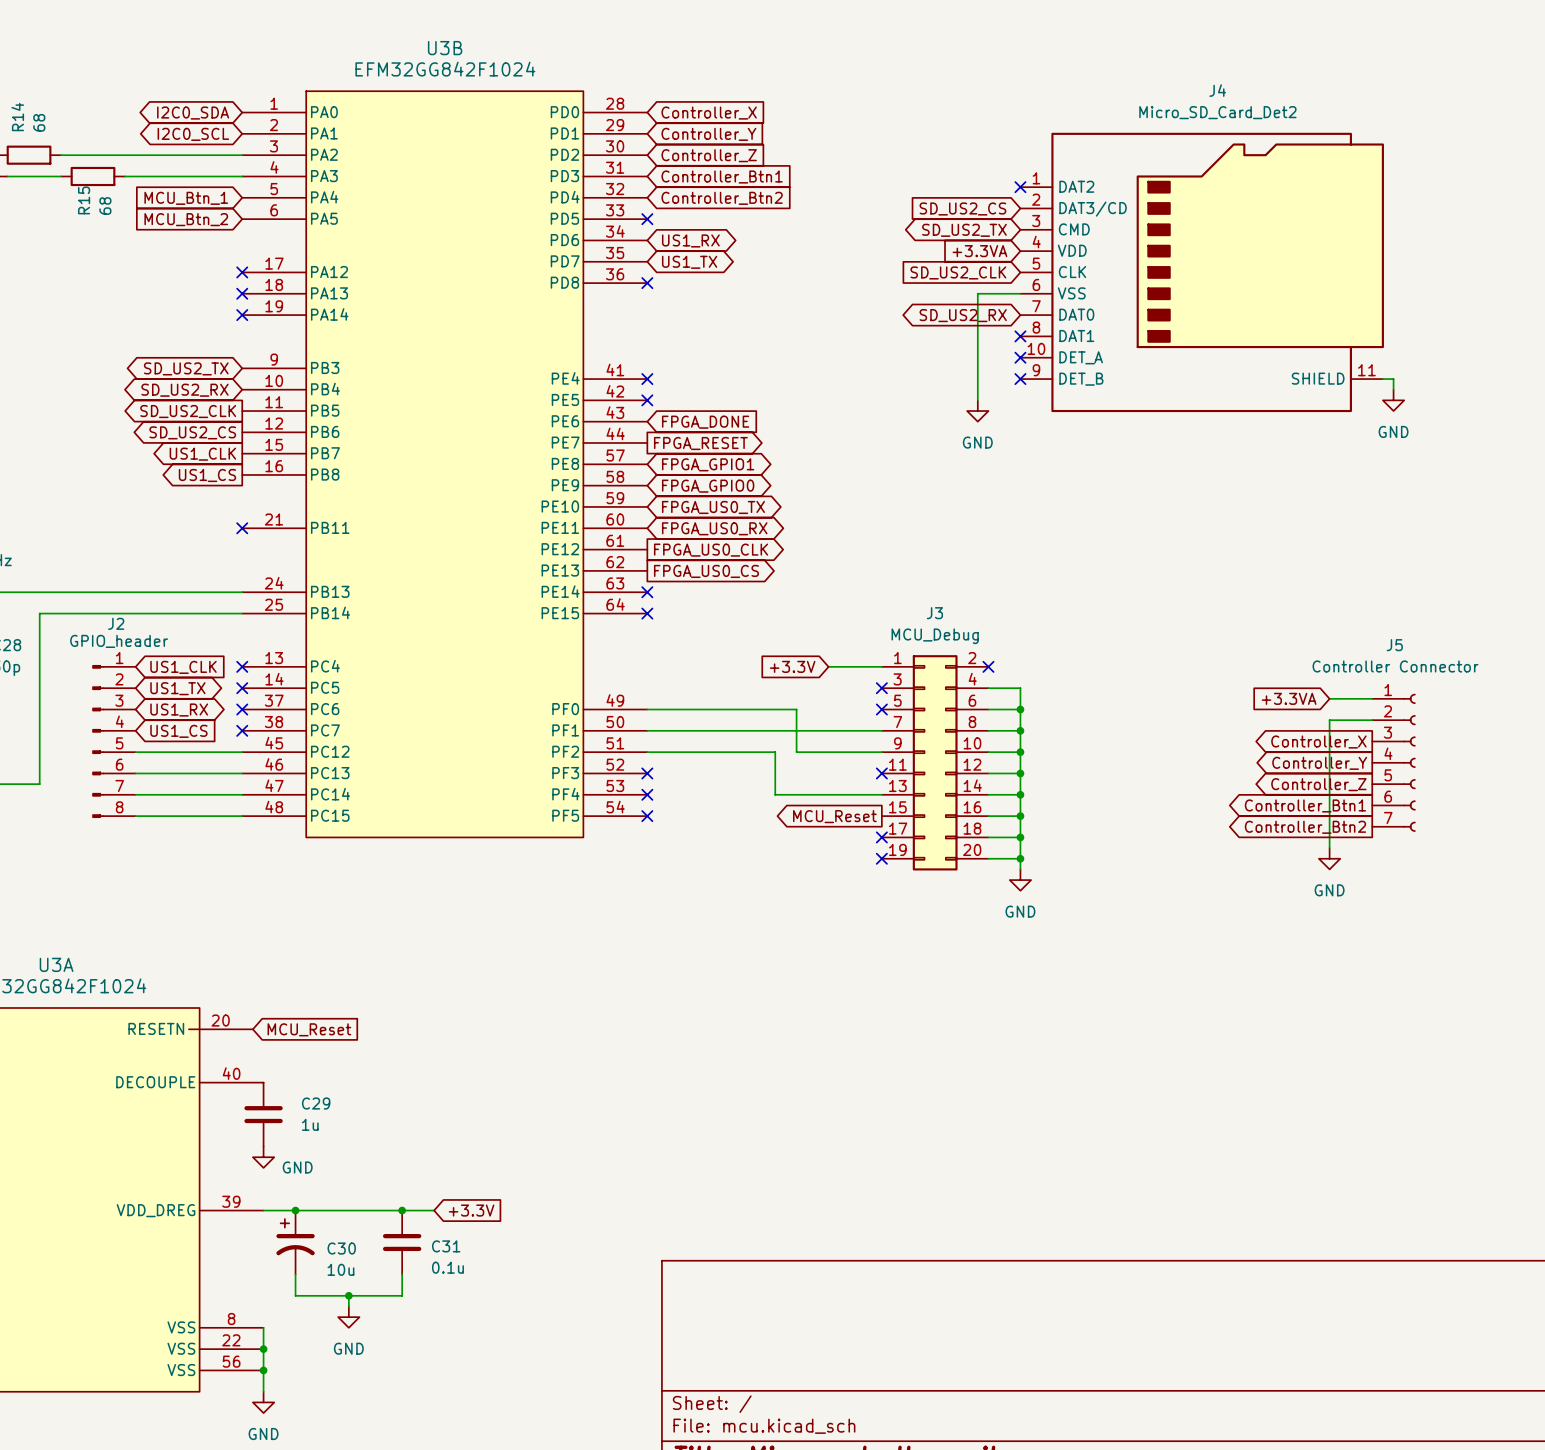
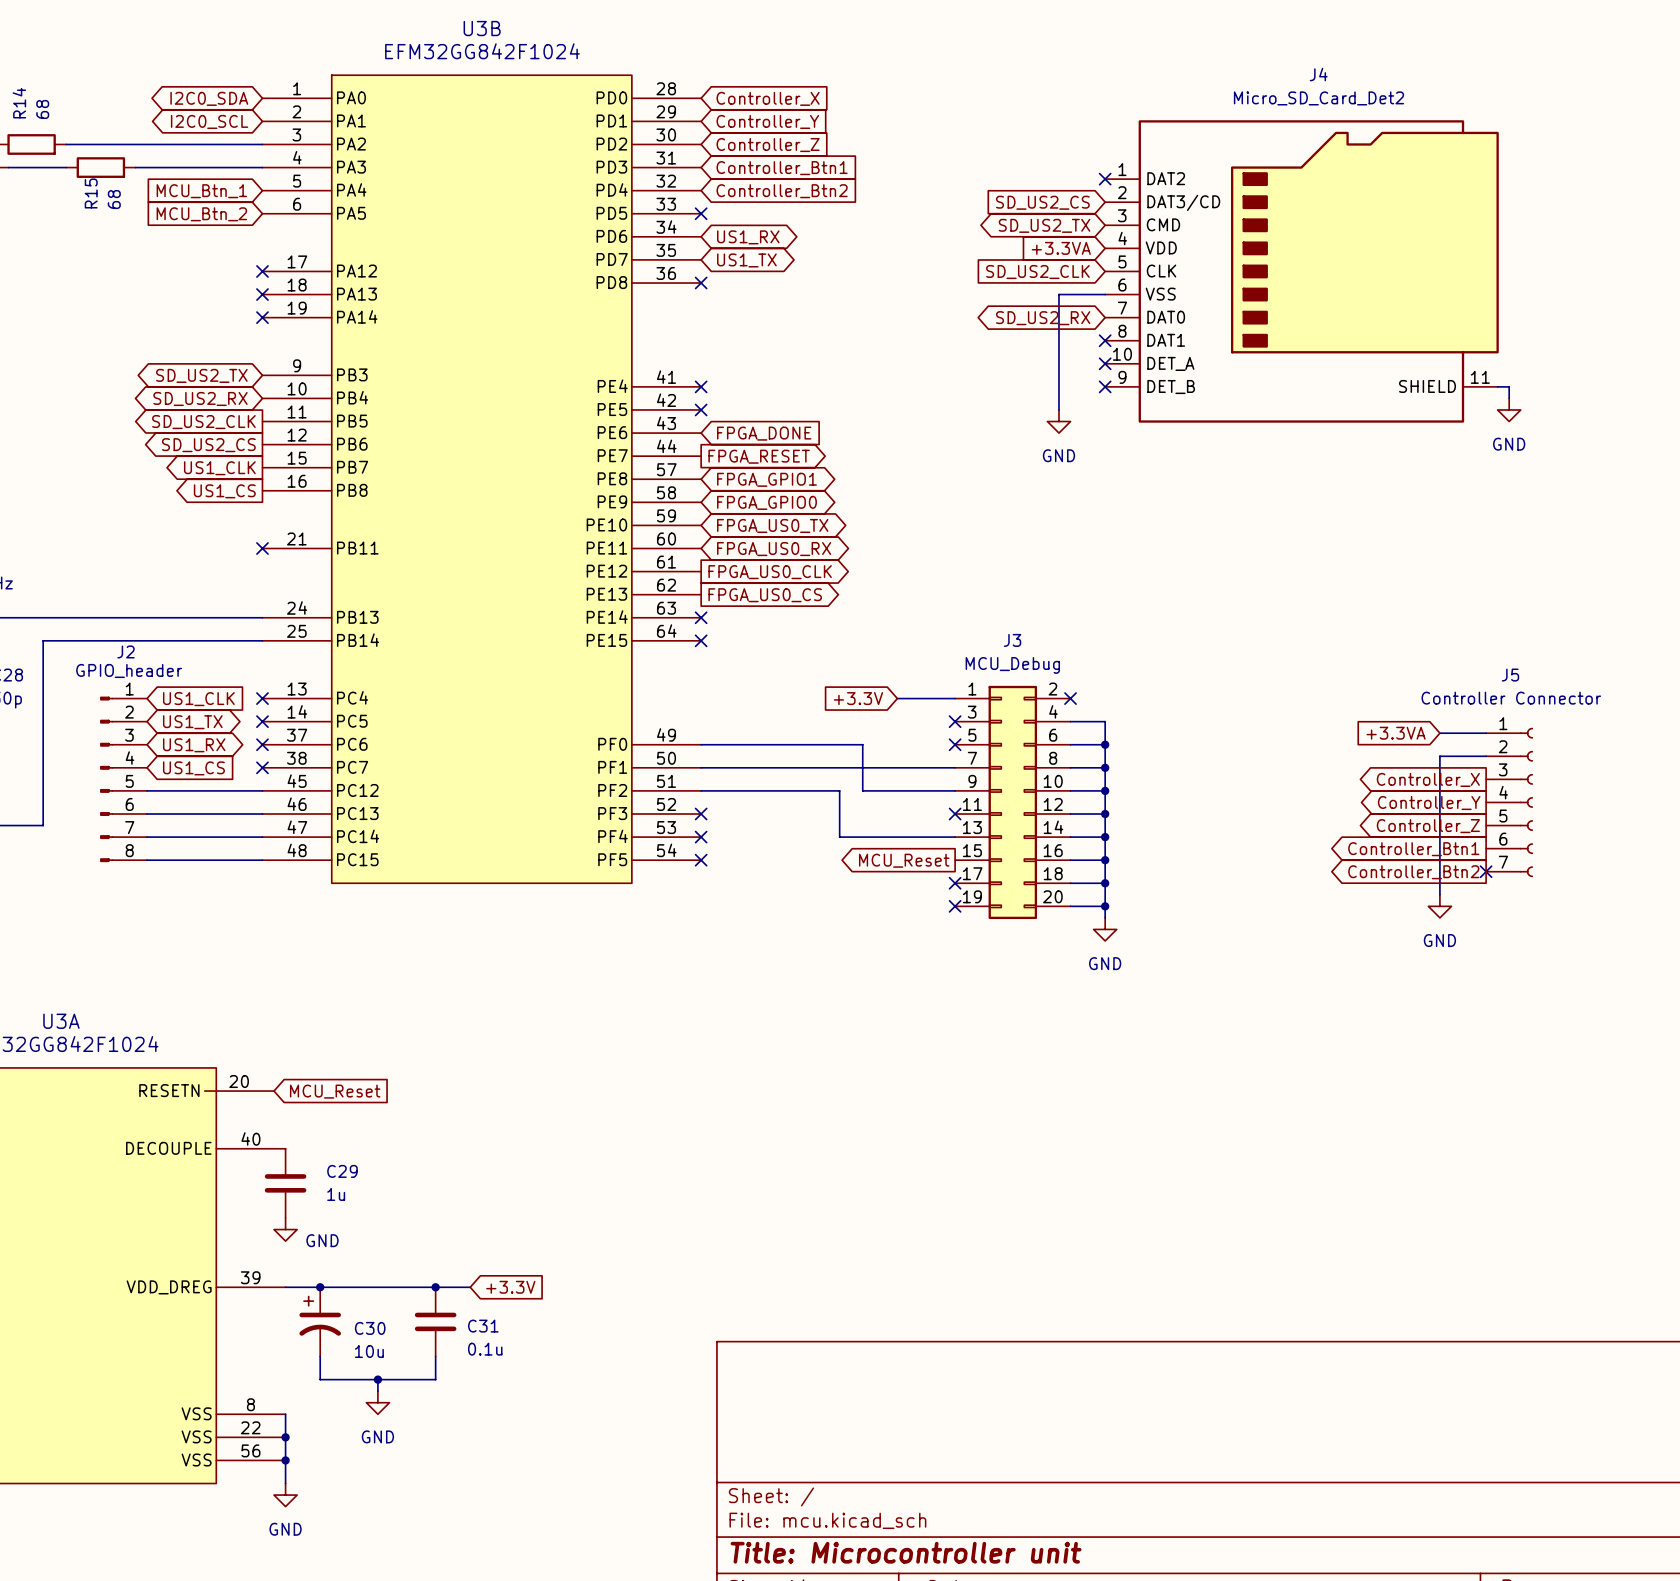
no-connect mark: none -> (1486, 871)

